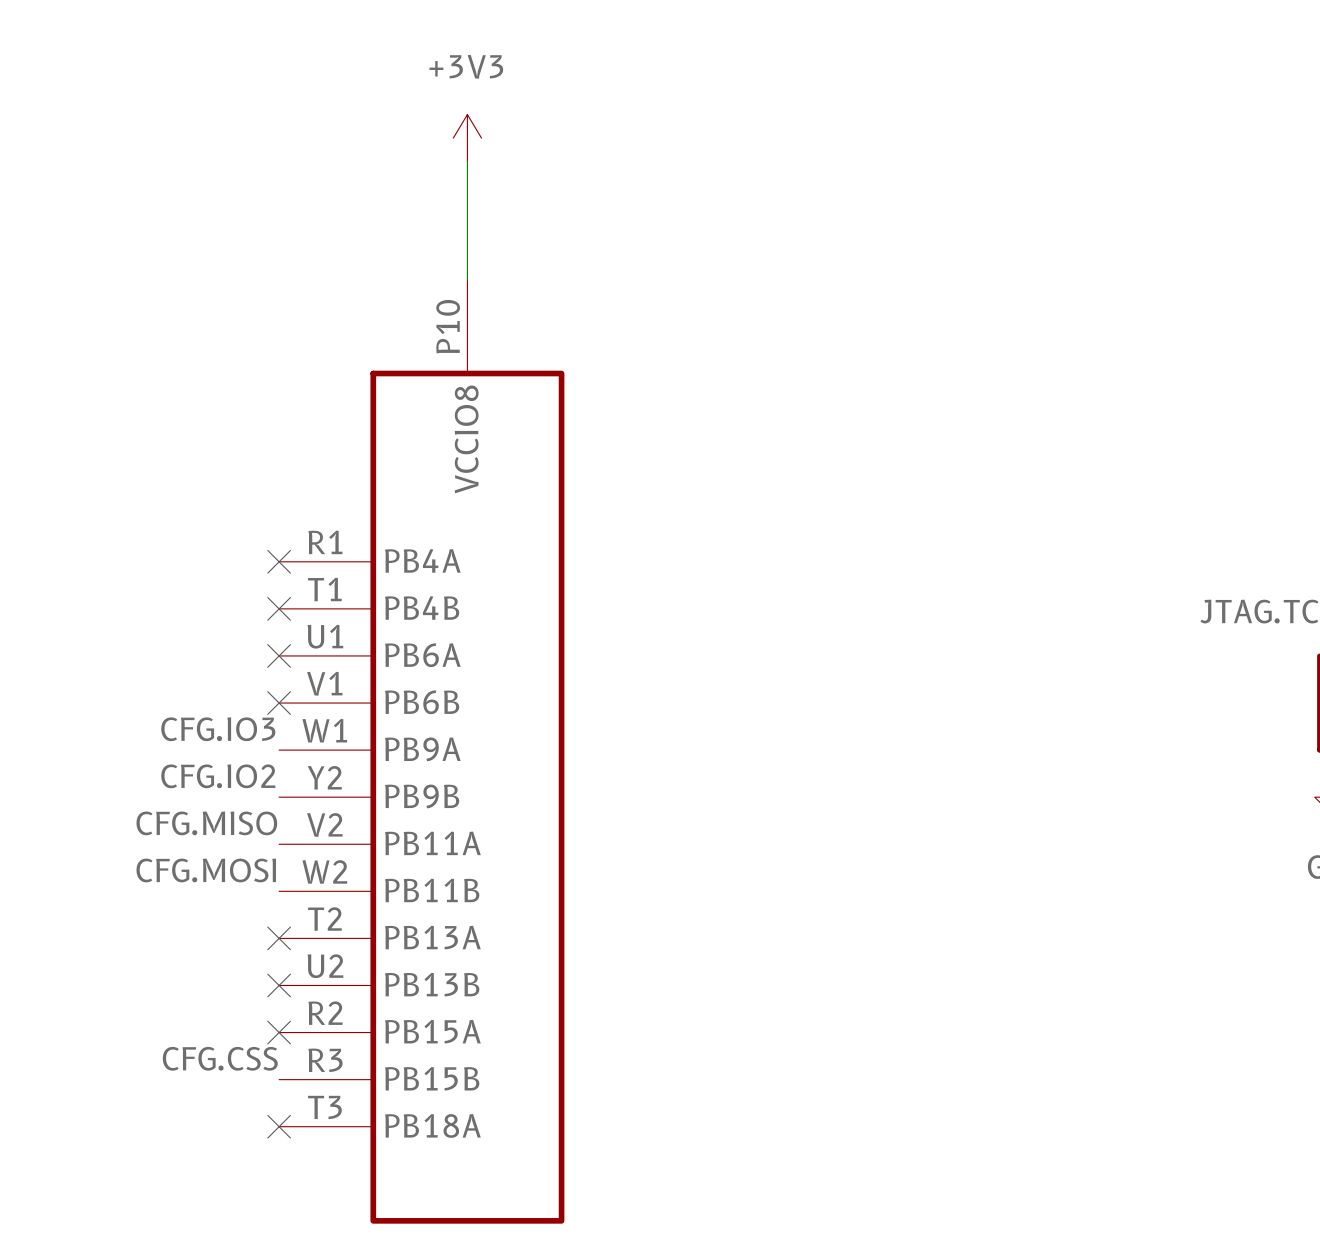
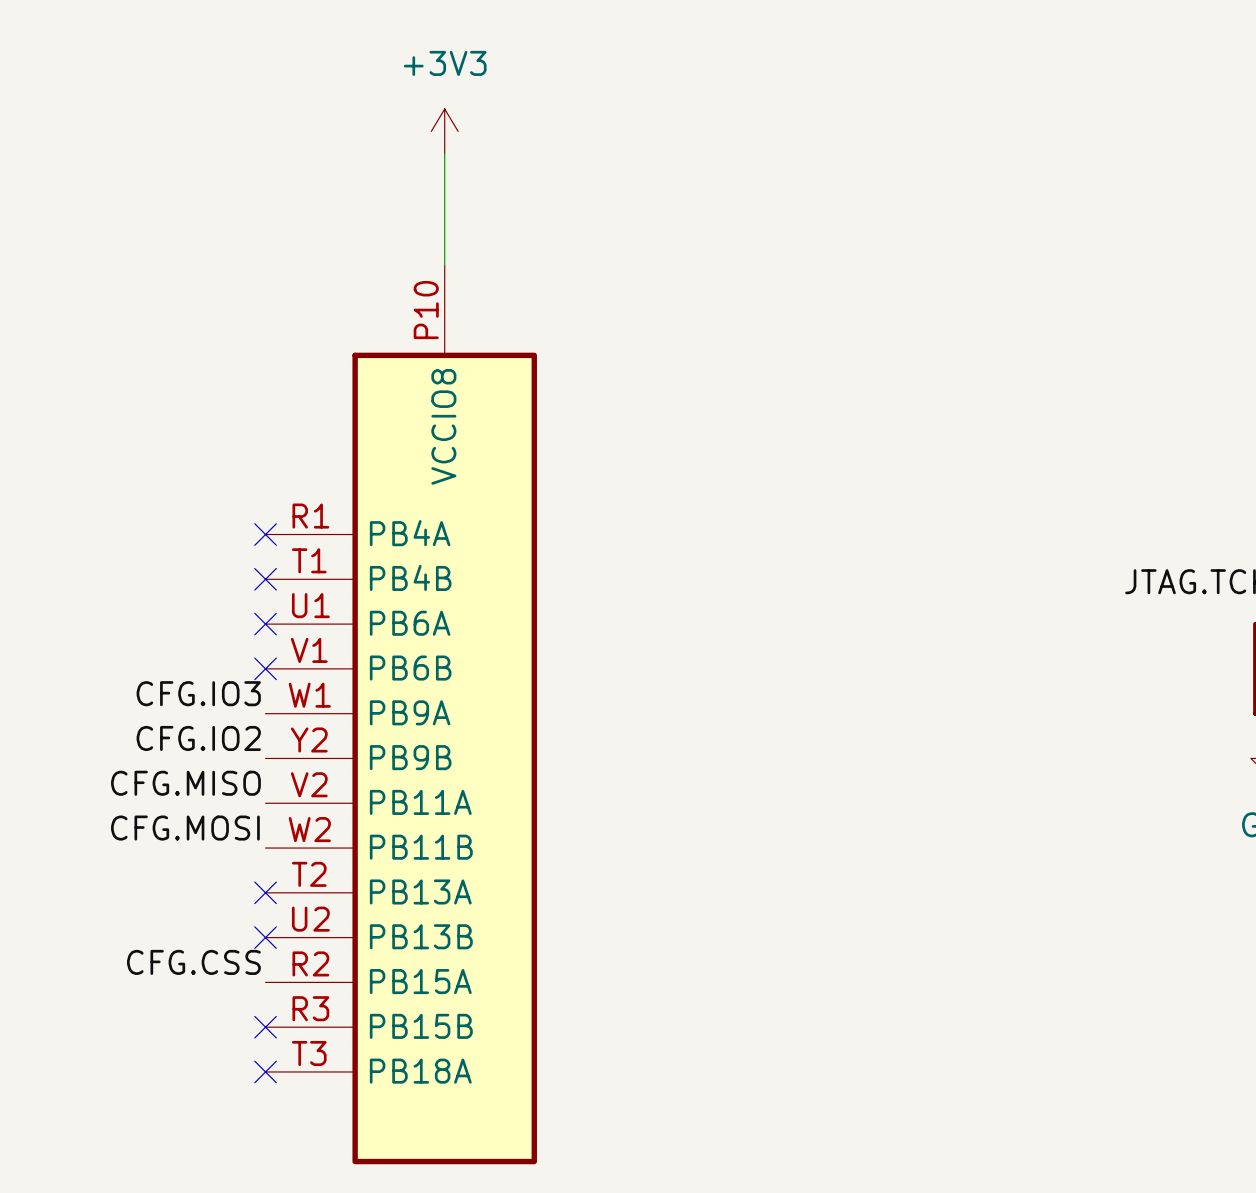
no-connect mark position: (279, 1032) -> (265, 1027)
label position: CFG.CSS (220, 1058) -> CFG.CSS (193, 962)

